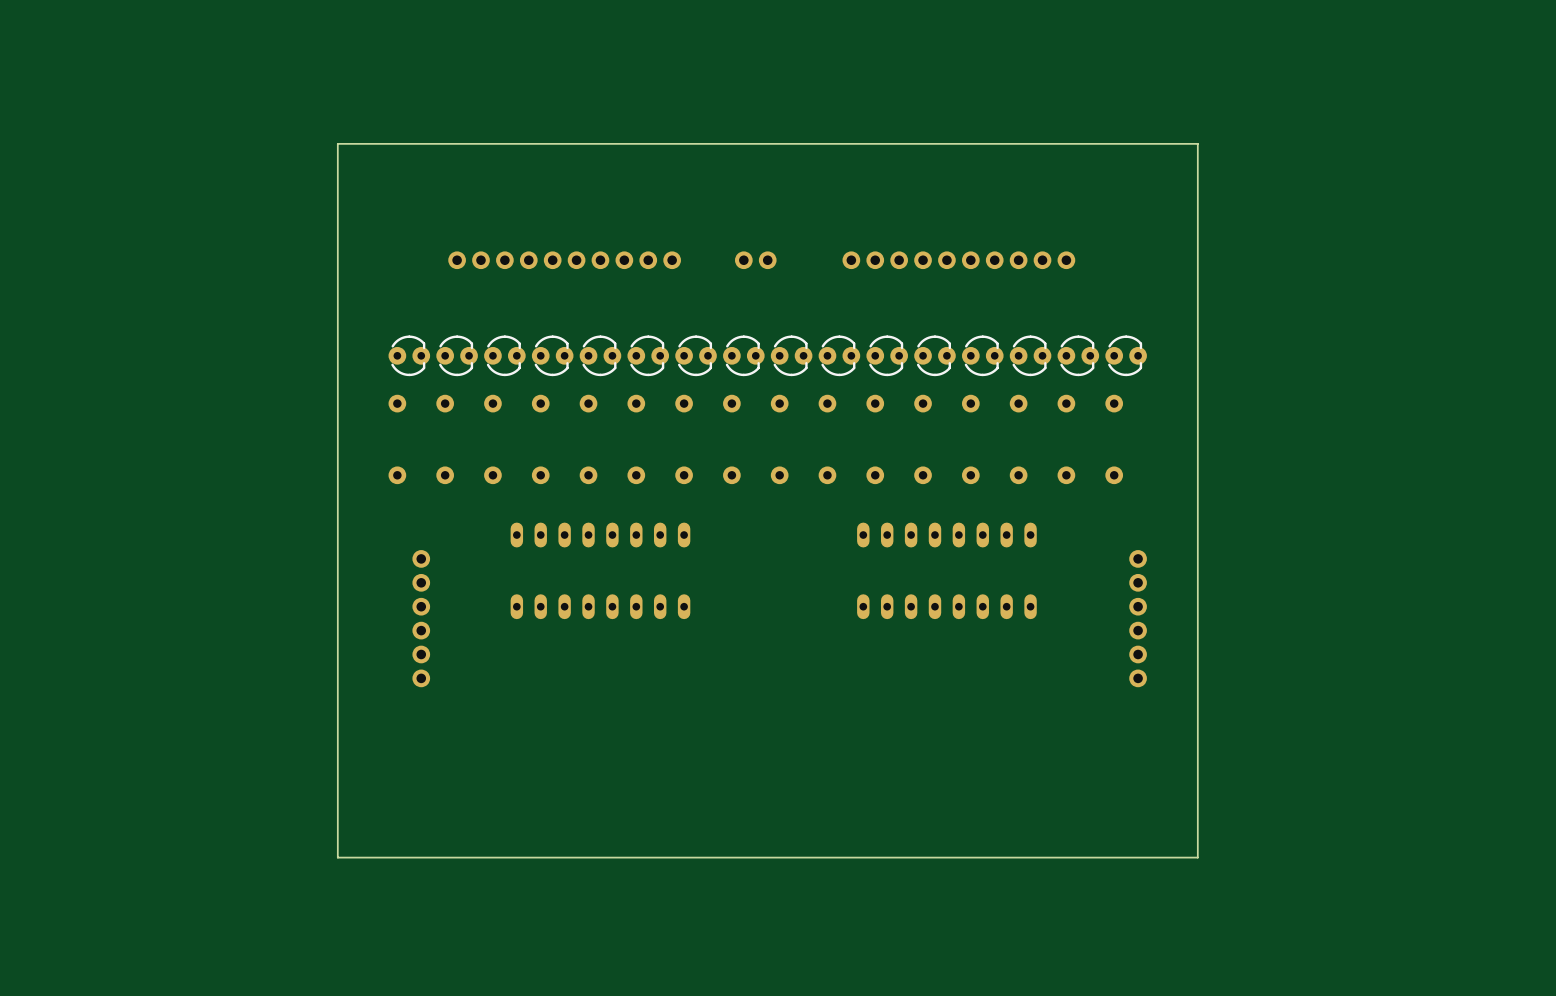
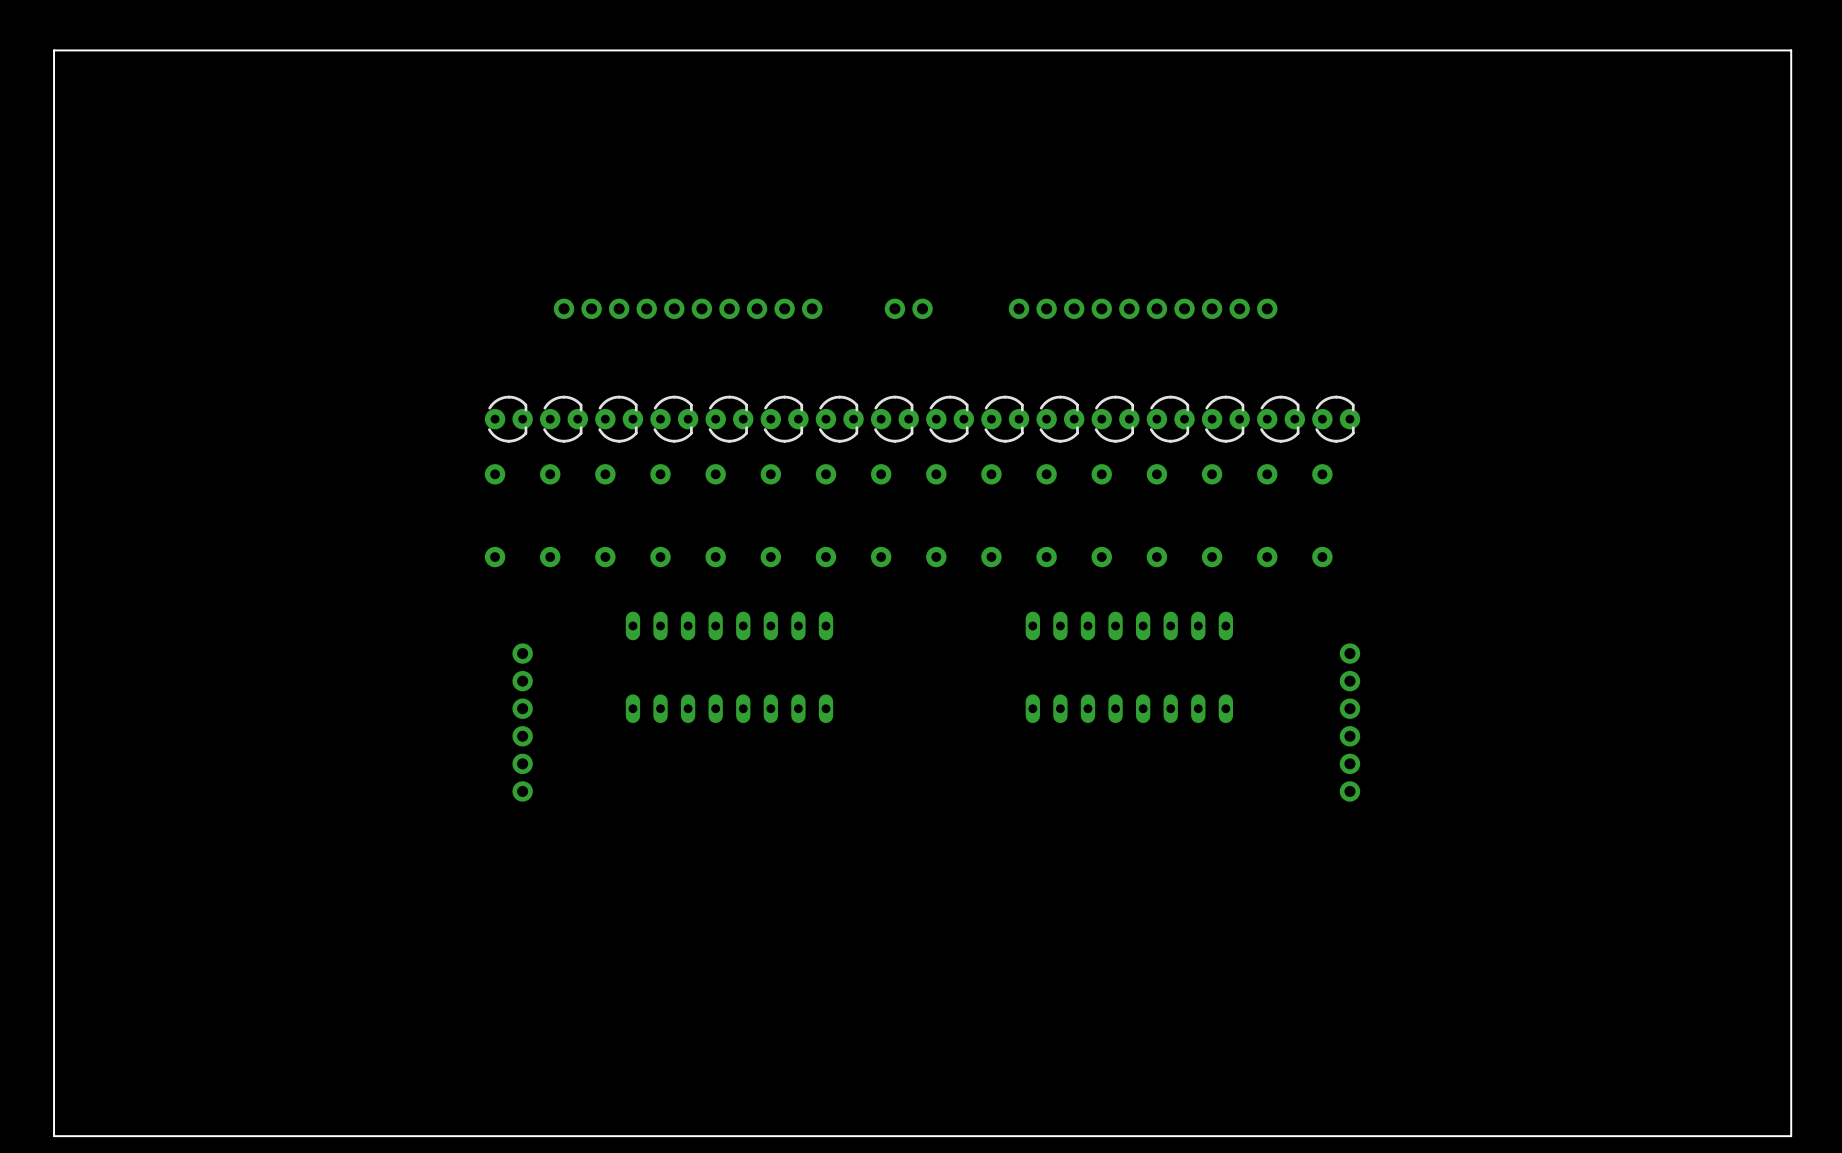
board edge: none -> (1791, 50) (54, 50) (54, 1136) (1791, 1136) (1791, 50)
board edge: (1197, 143) (337, 143) (337, 857) (1197, 857) (1197, 143) -> none

